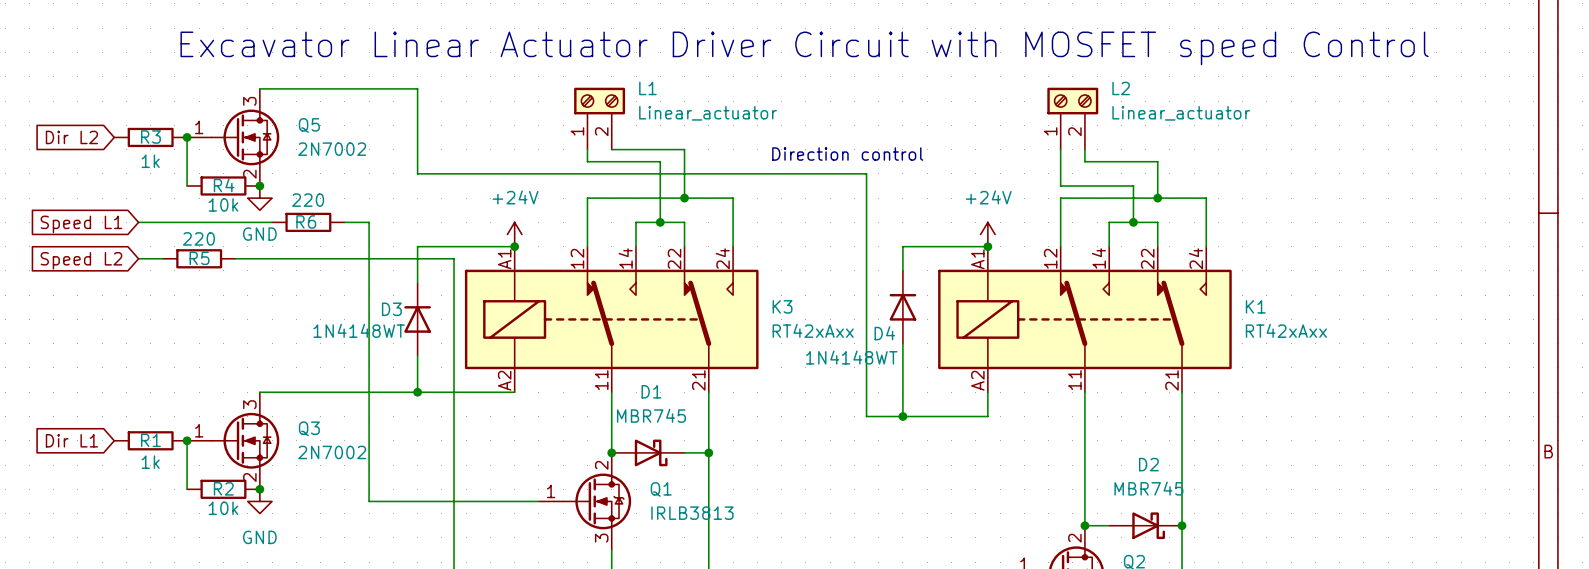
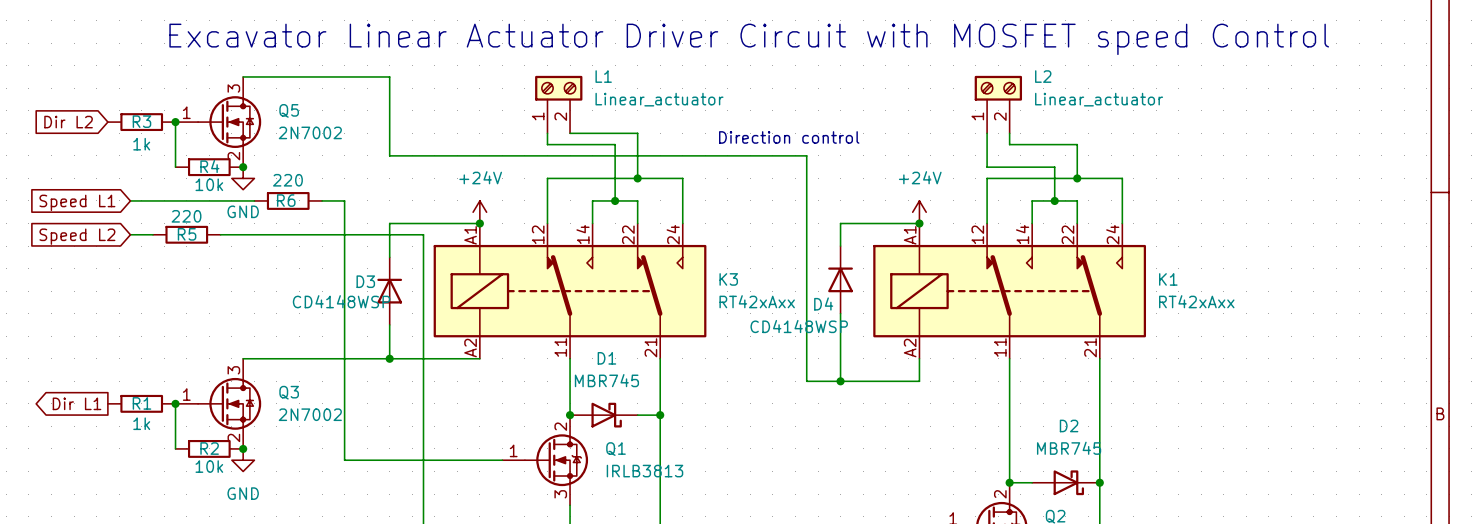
D3 value: 1N4148WT (359, 330) -> CD4148WSP (341, 301)
D4 value: 1N4148WT (851, 357) -> CD4148WSP (799, 326)
global label shape: input (71, 440) -> output (77, 403)

